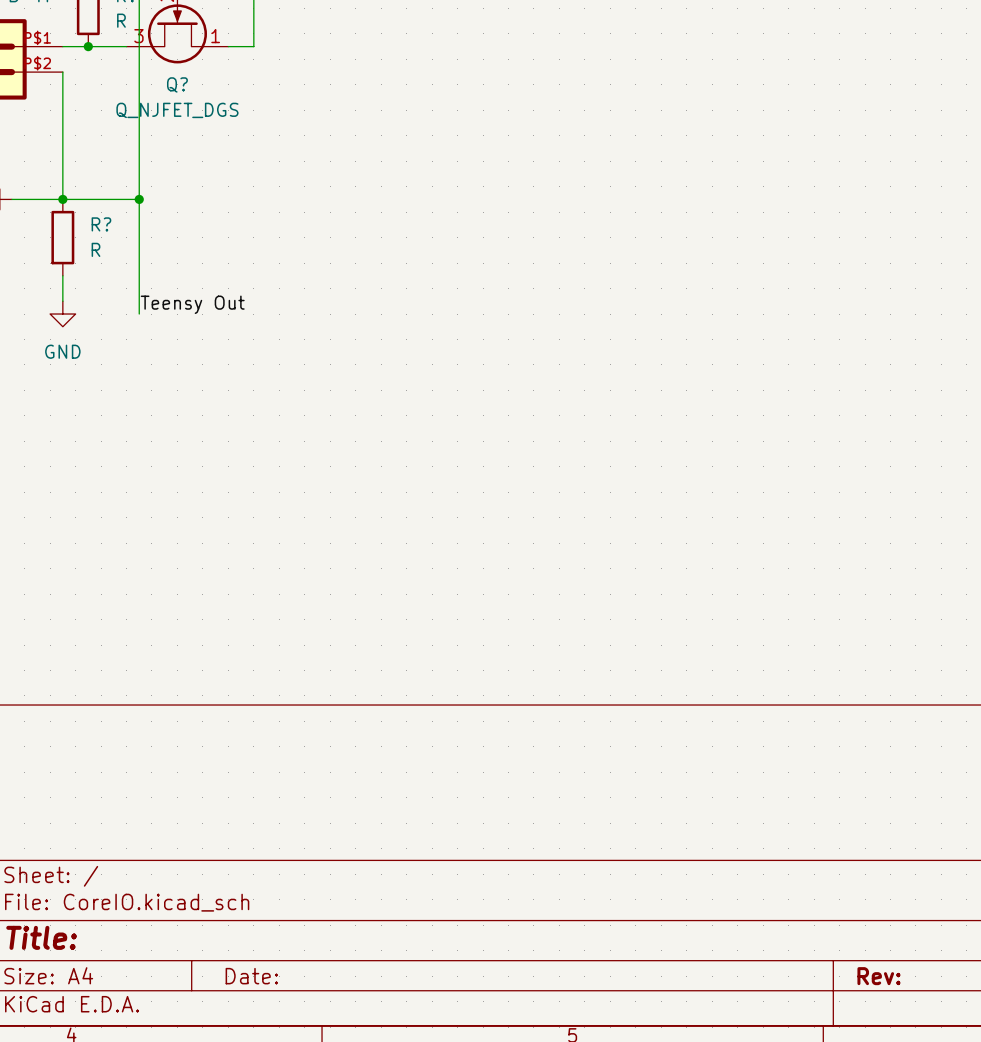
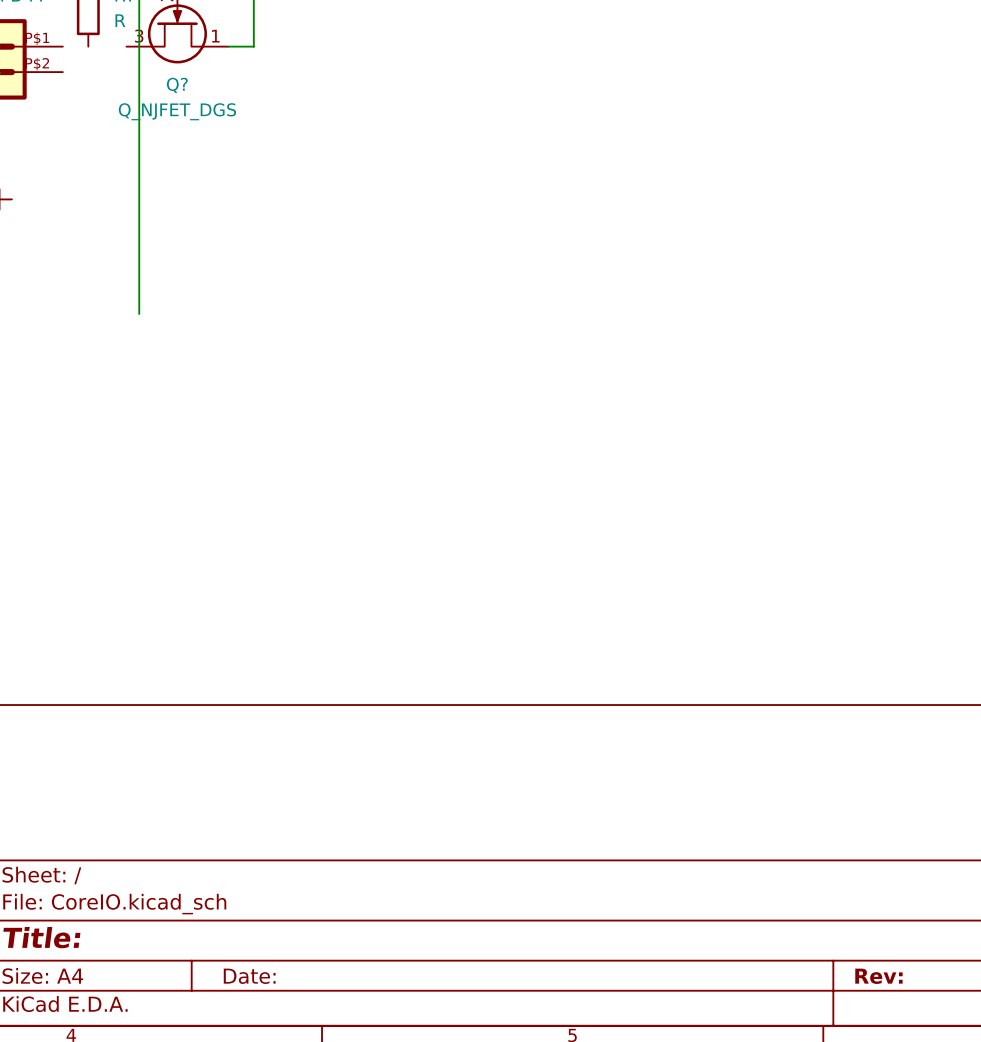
wire: (62, 46) (126, 46) -> none
junction: (88, 46) -> none
wire: (62, 72) (62, 199) -> none
wire: (11, 199) (139, 199) -> none
junction: (62, 199) -> none
junction: (139, 199) -> none
R?: R (62, 237) -> none
wire: (62, 275) (62, 301) -> none
label: Teensy Out (192, 304) -> none
power symbol: GND (62, 314) -> none

